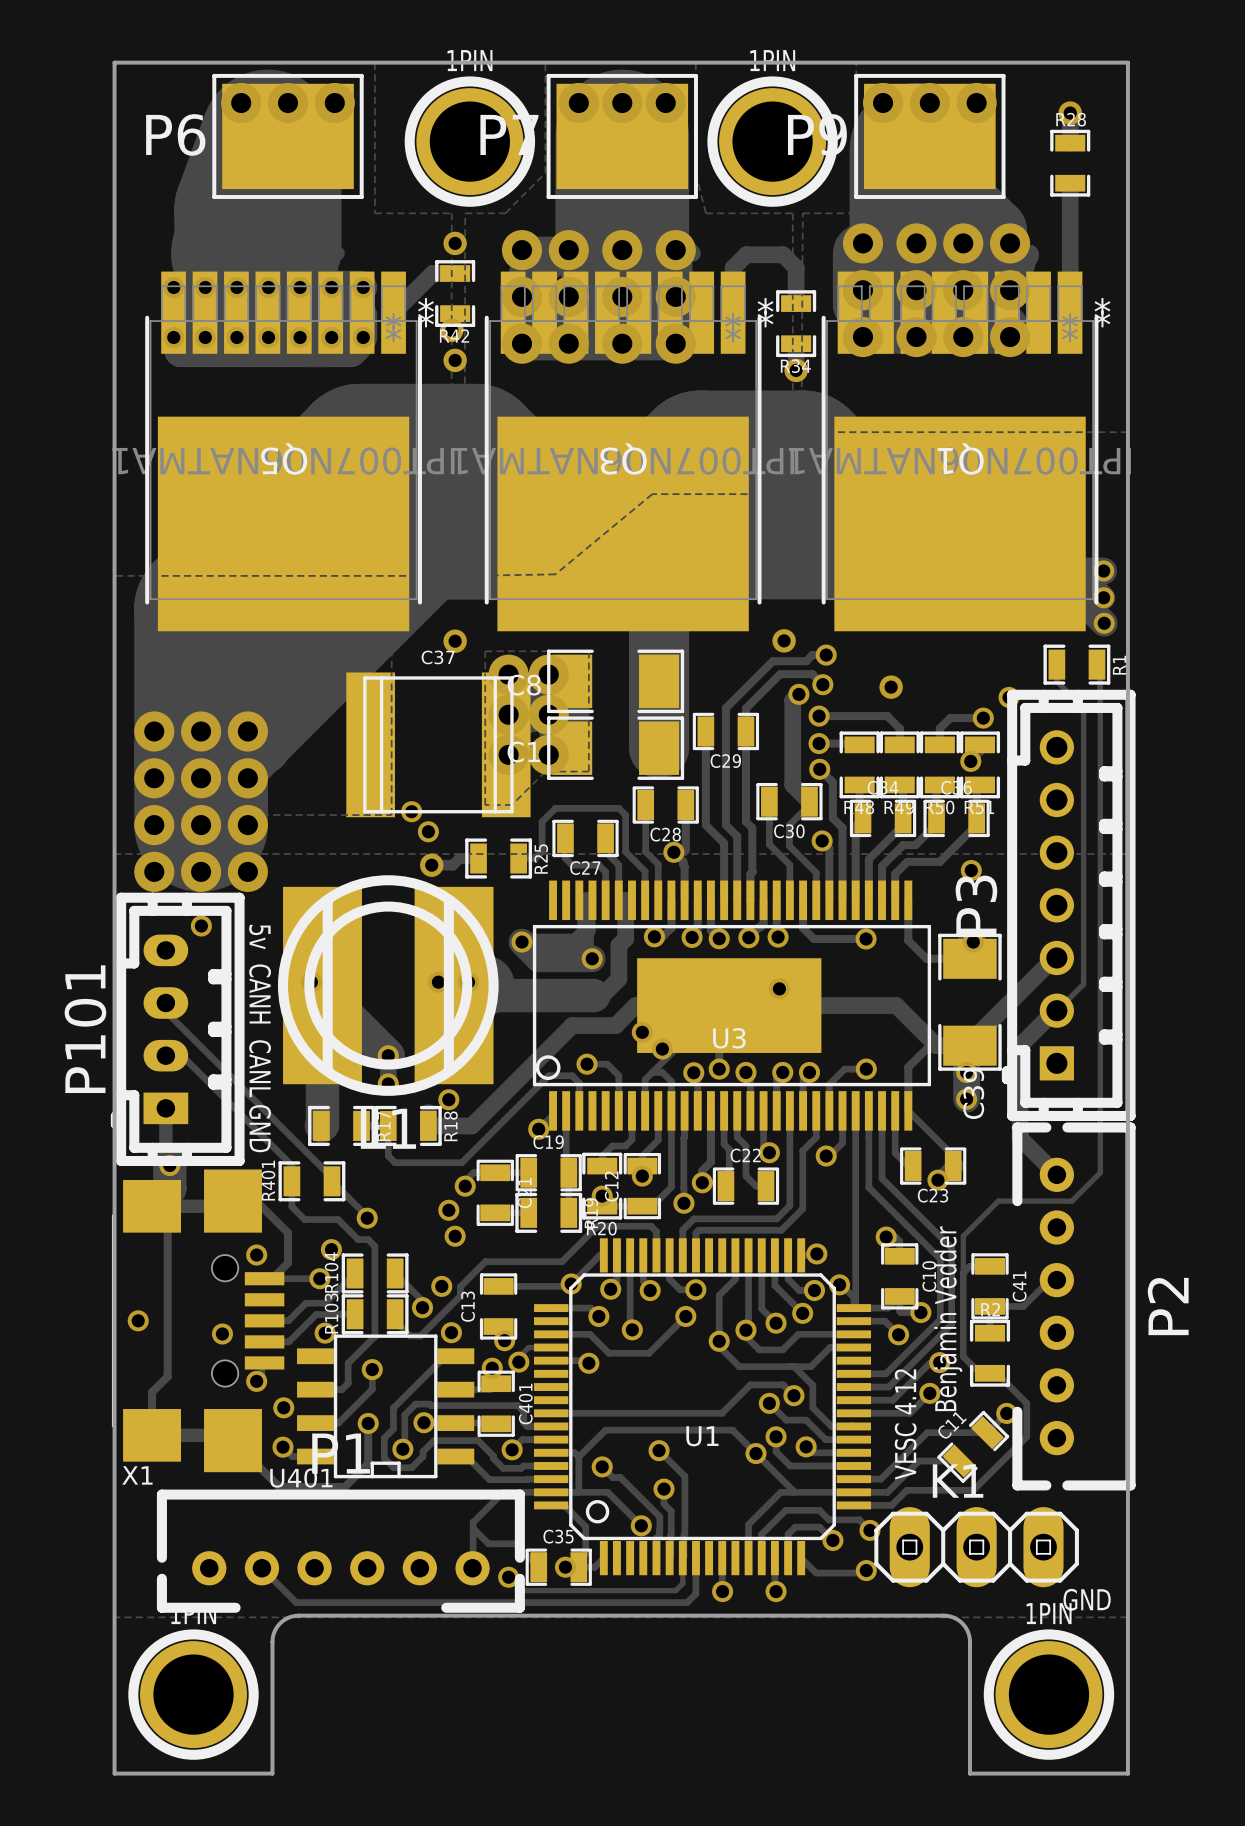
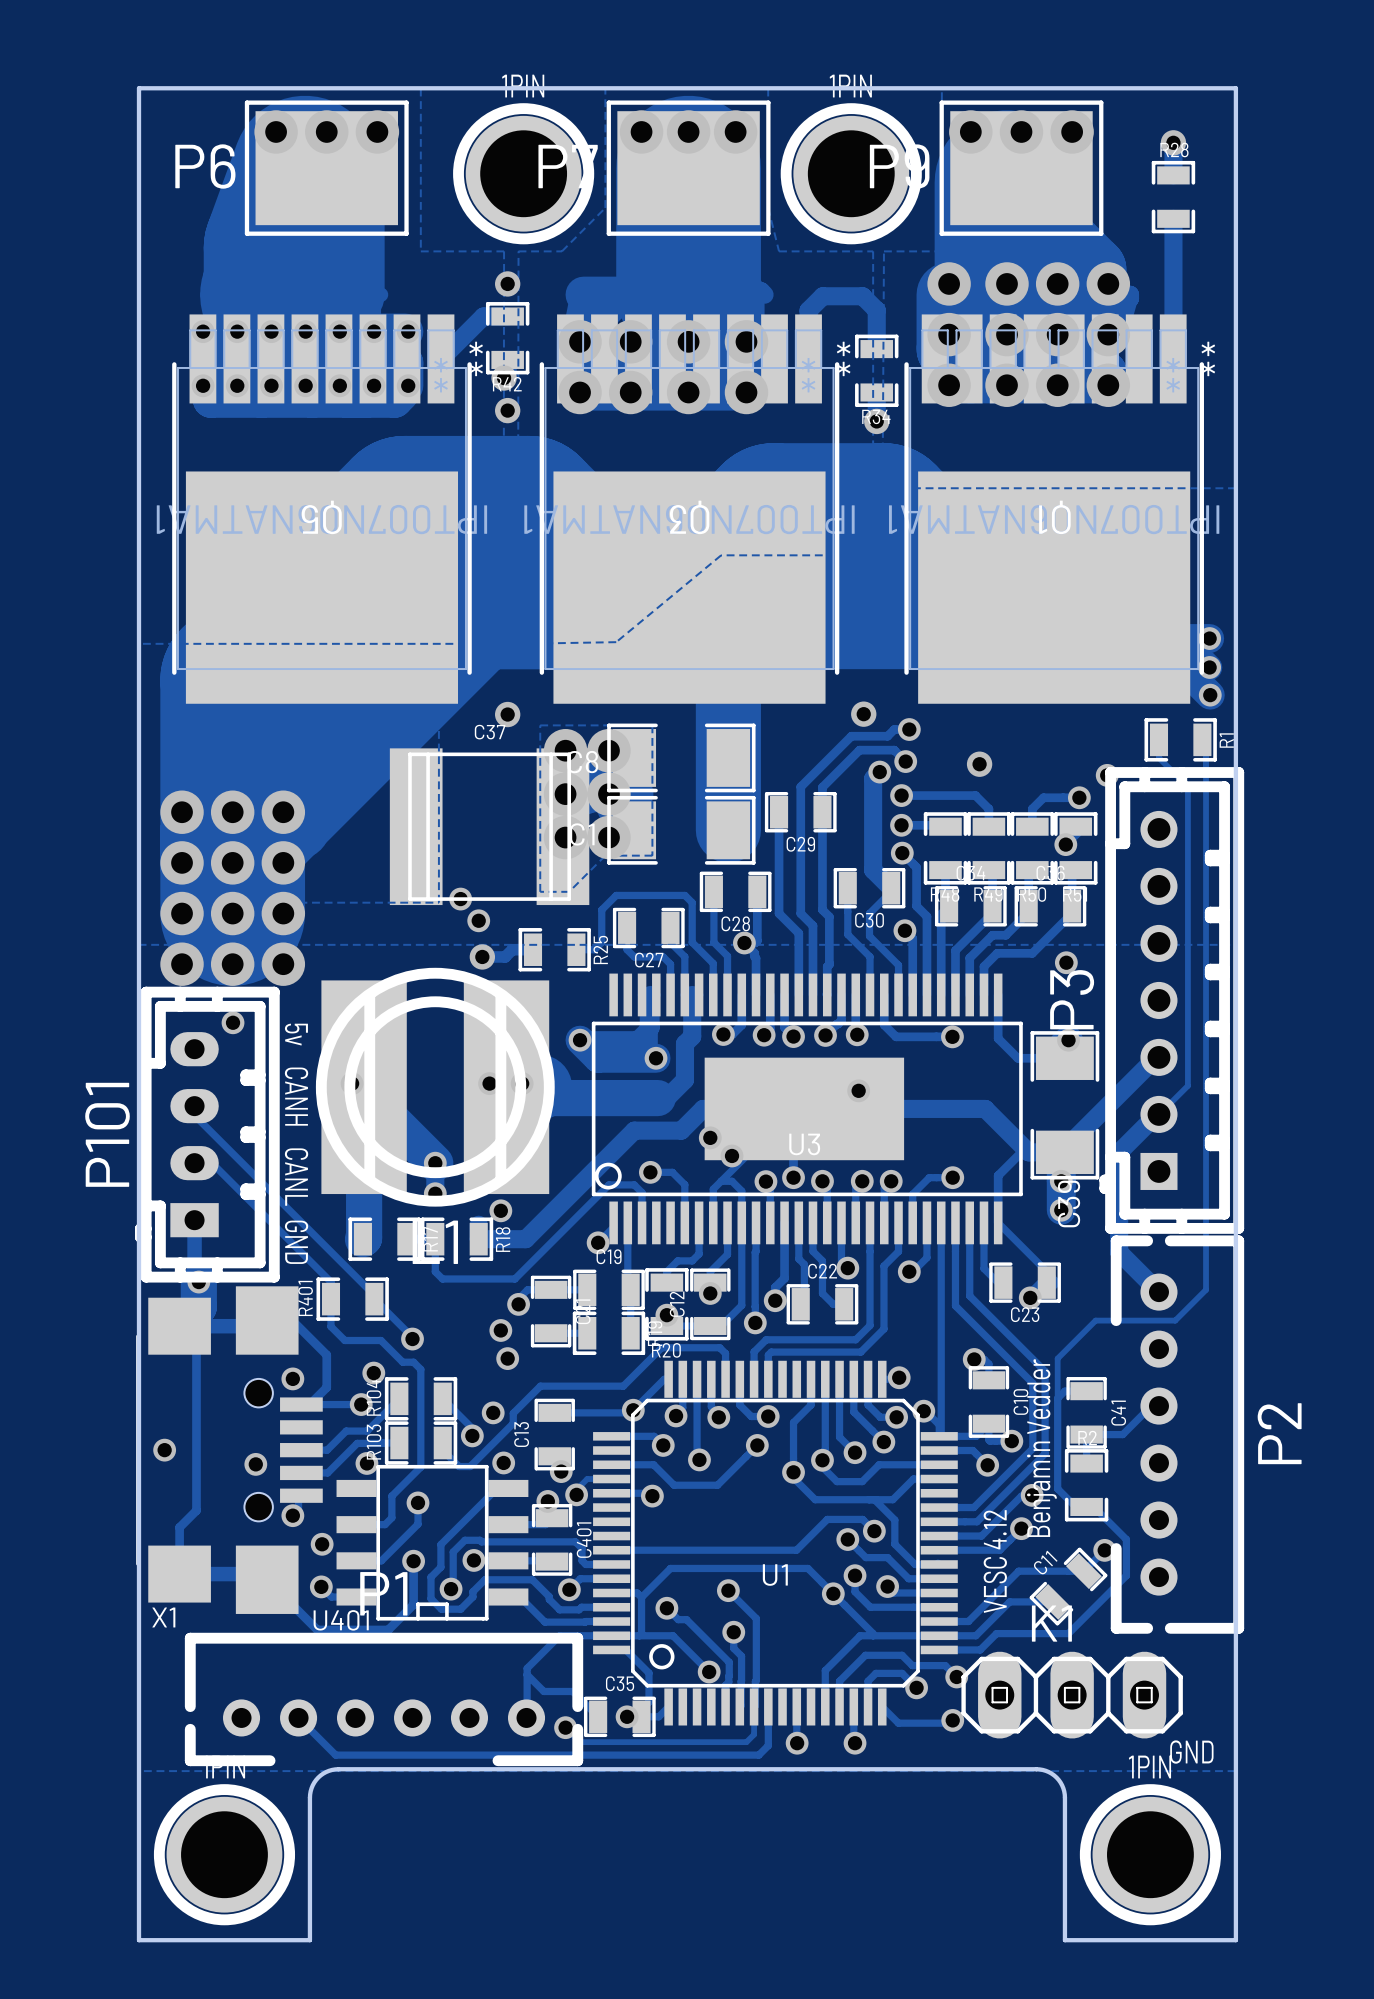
via: (522, 250) -> none
via: (568, 250) -> none
via: (622, 250) -> none
via: (675, 250) -> none

